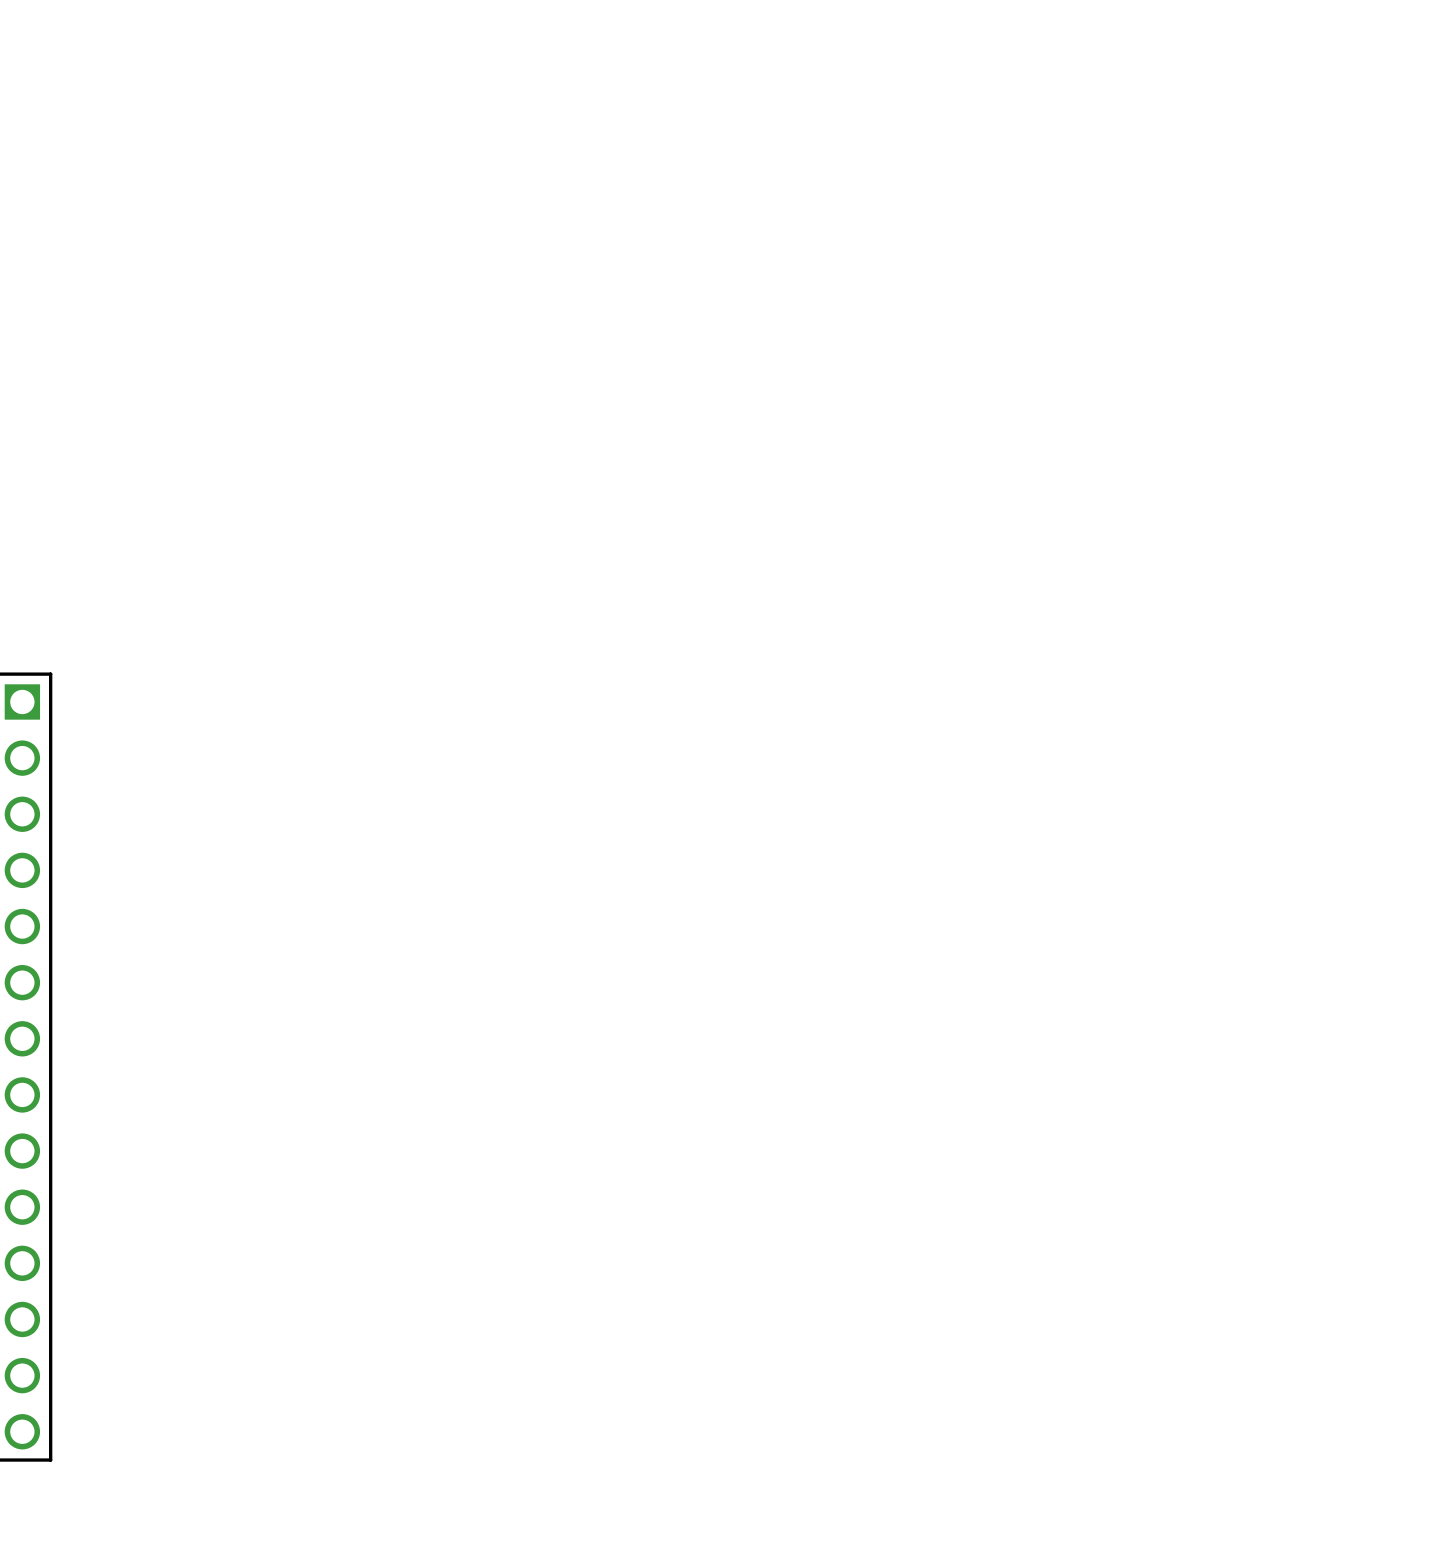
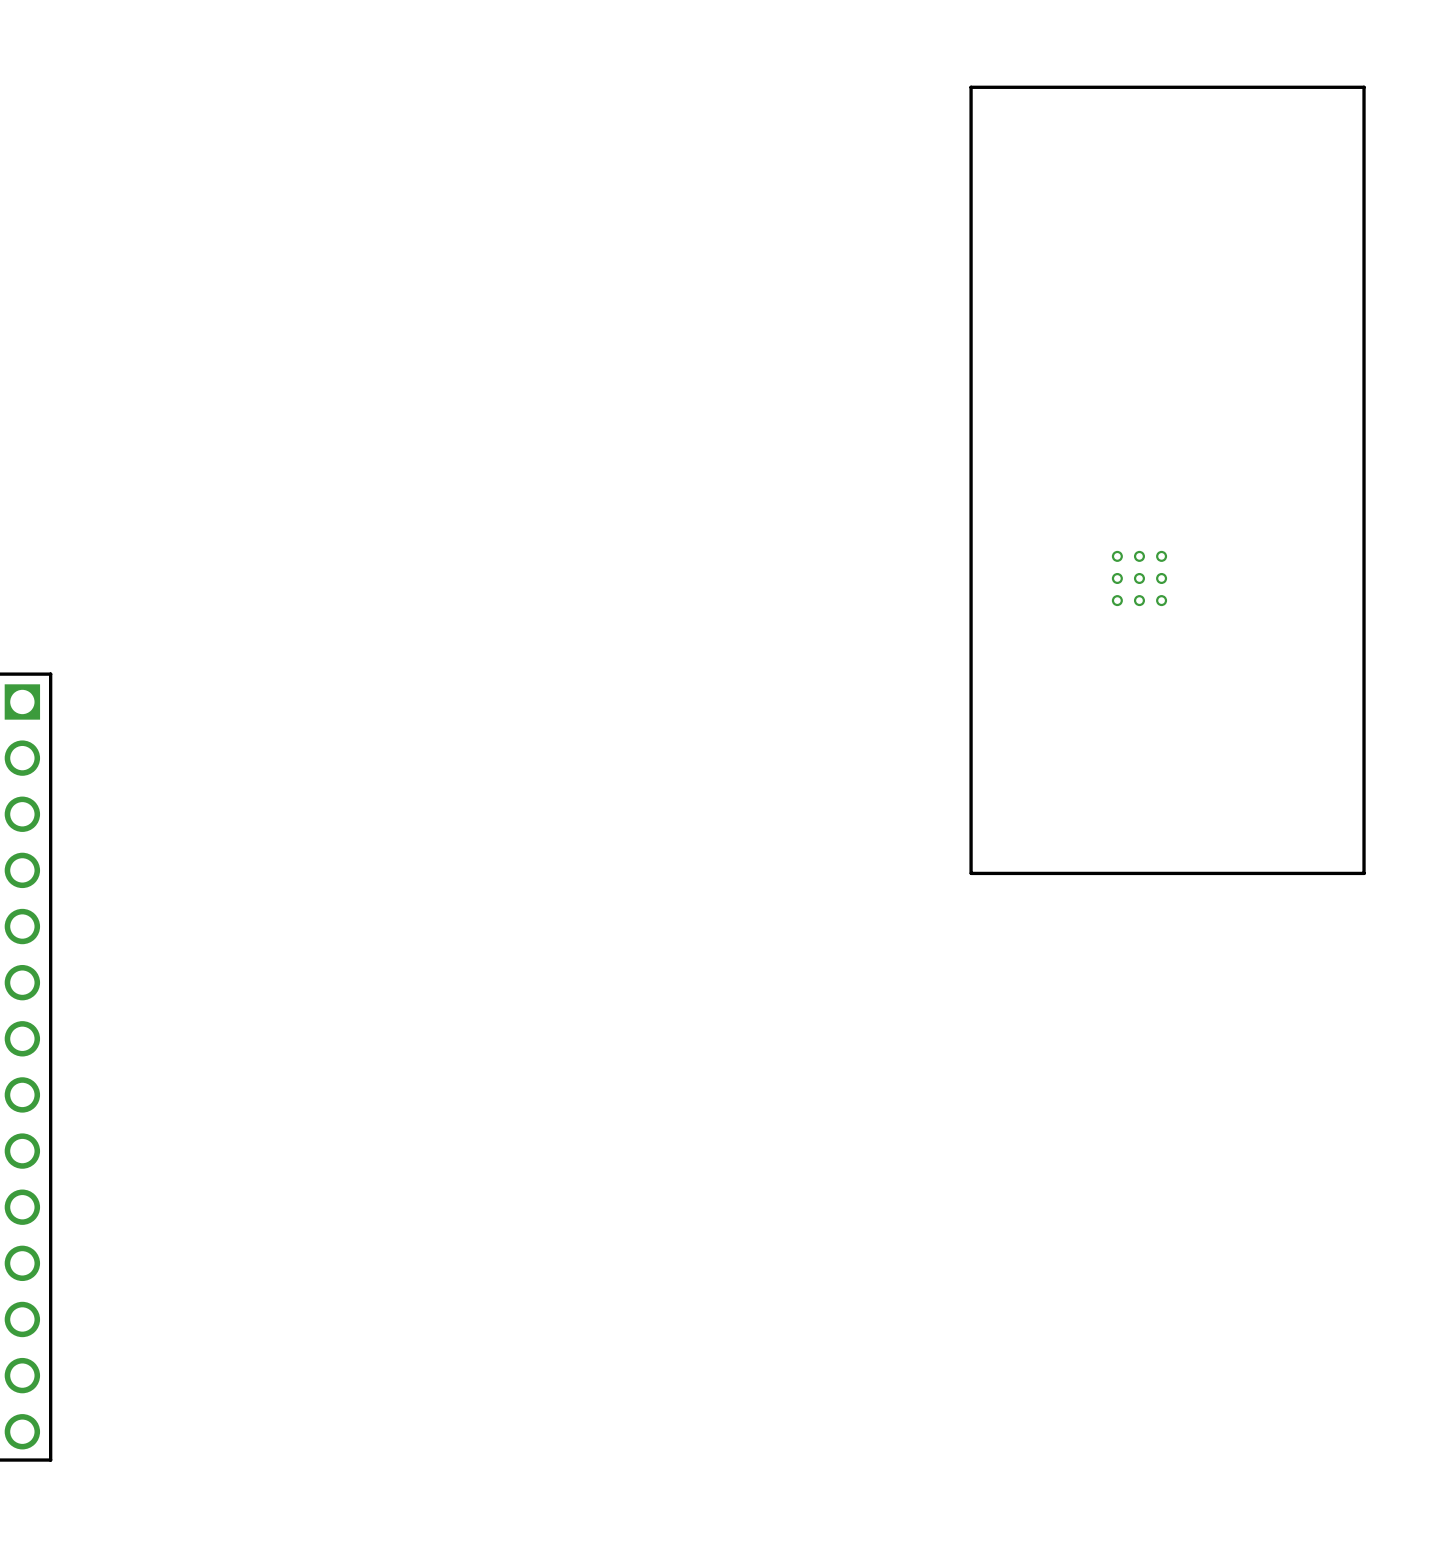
part: none -> (1139, 578)
board edge: none -> (1364, 873) (1364, 87) (971, 87) (971, 873)
board edge: none -> (1364, 873) (971, 873)

